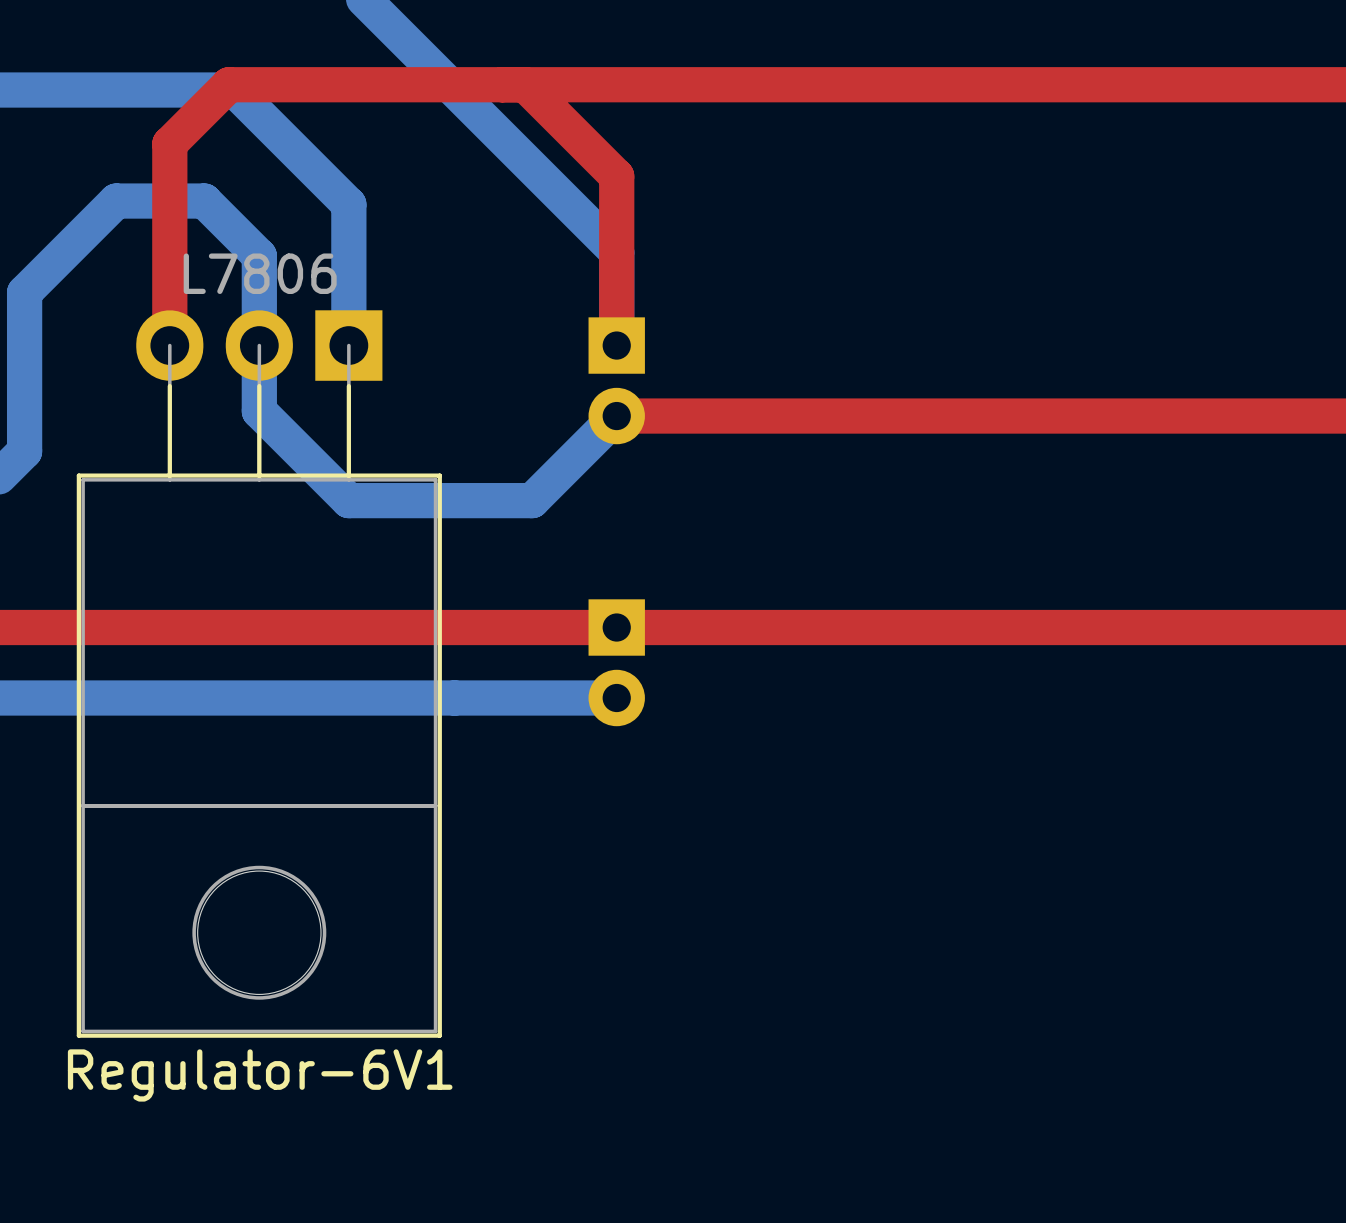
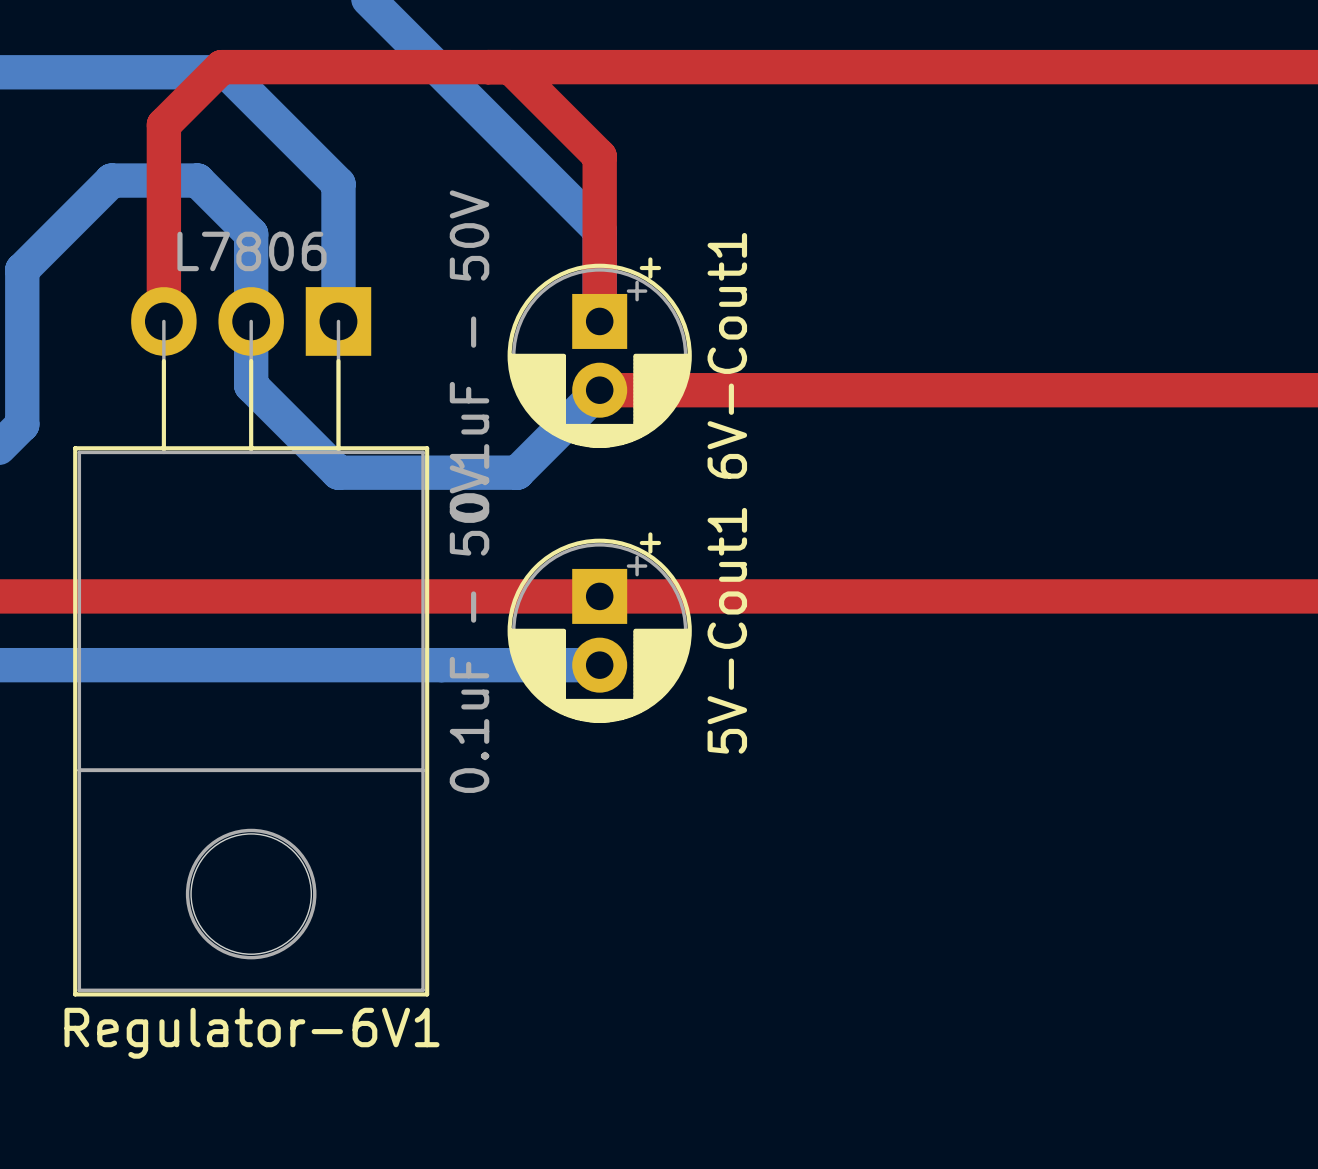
6V-Cout1 side: bottom (616, 380) -> top (599, 352)
5V-Cout1 side: bottom (616, 662) -> top (599, 627)

